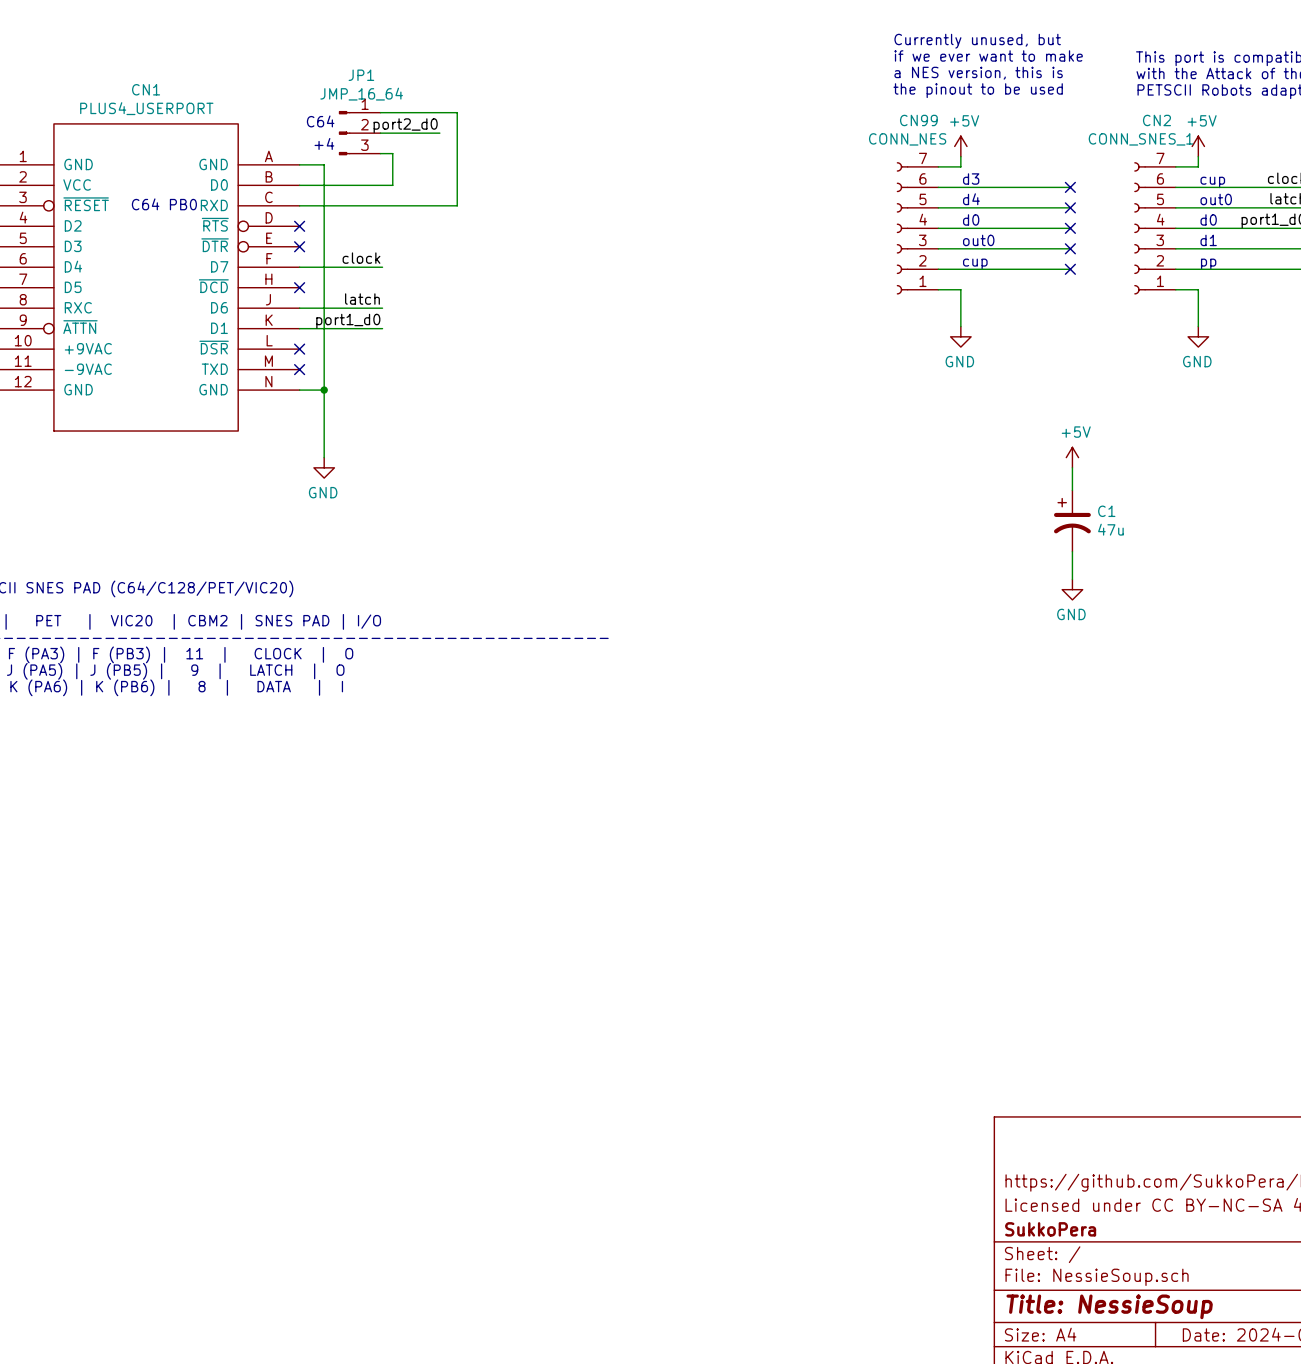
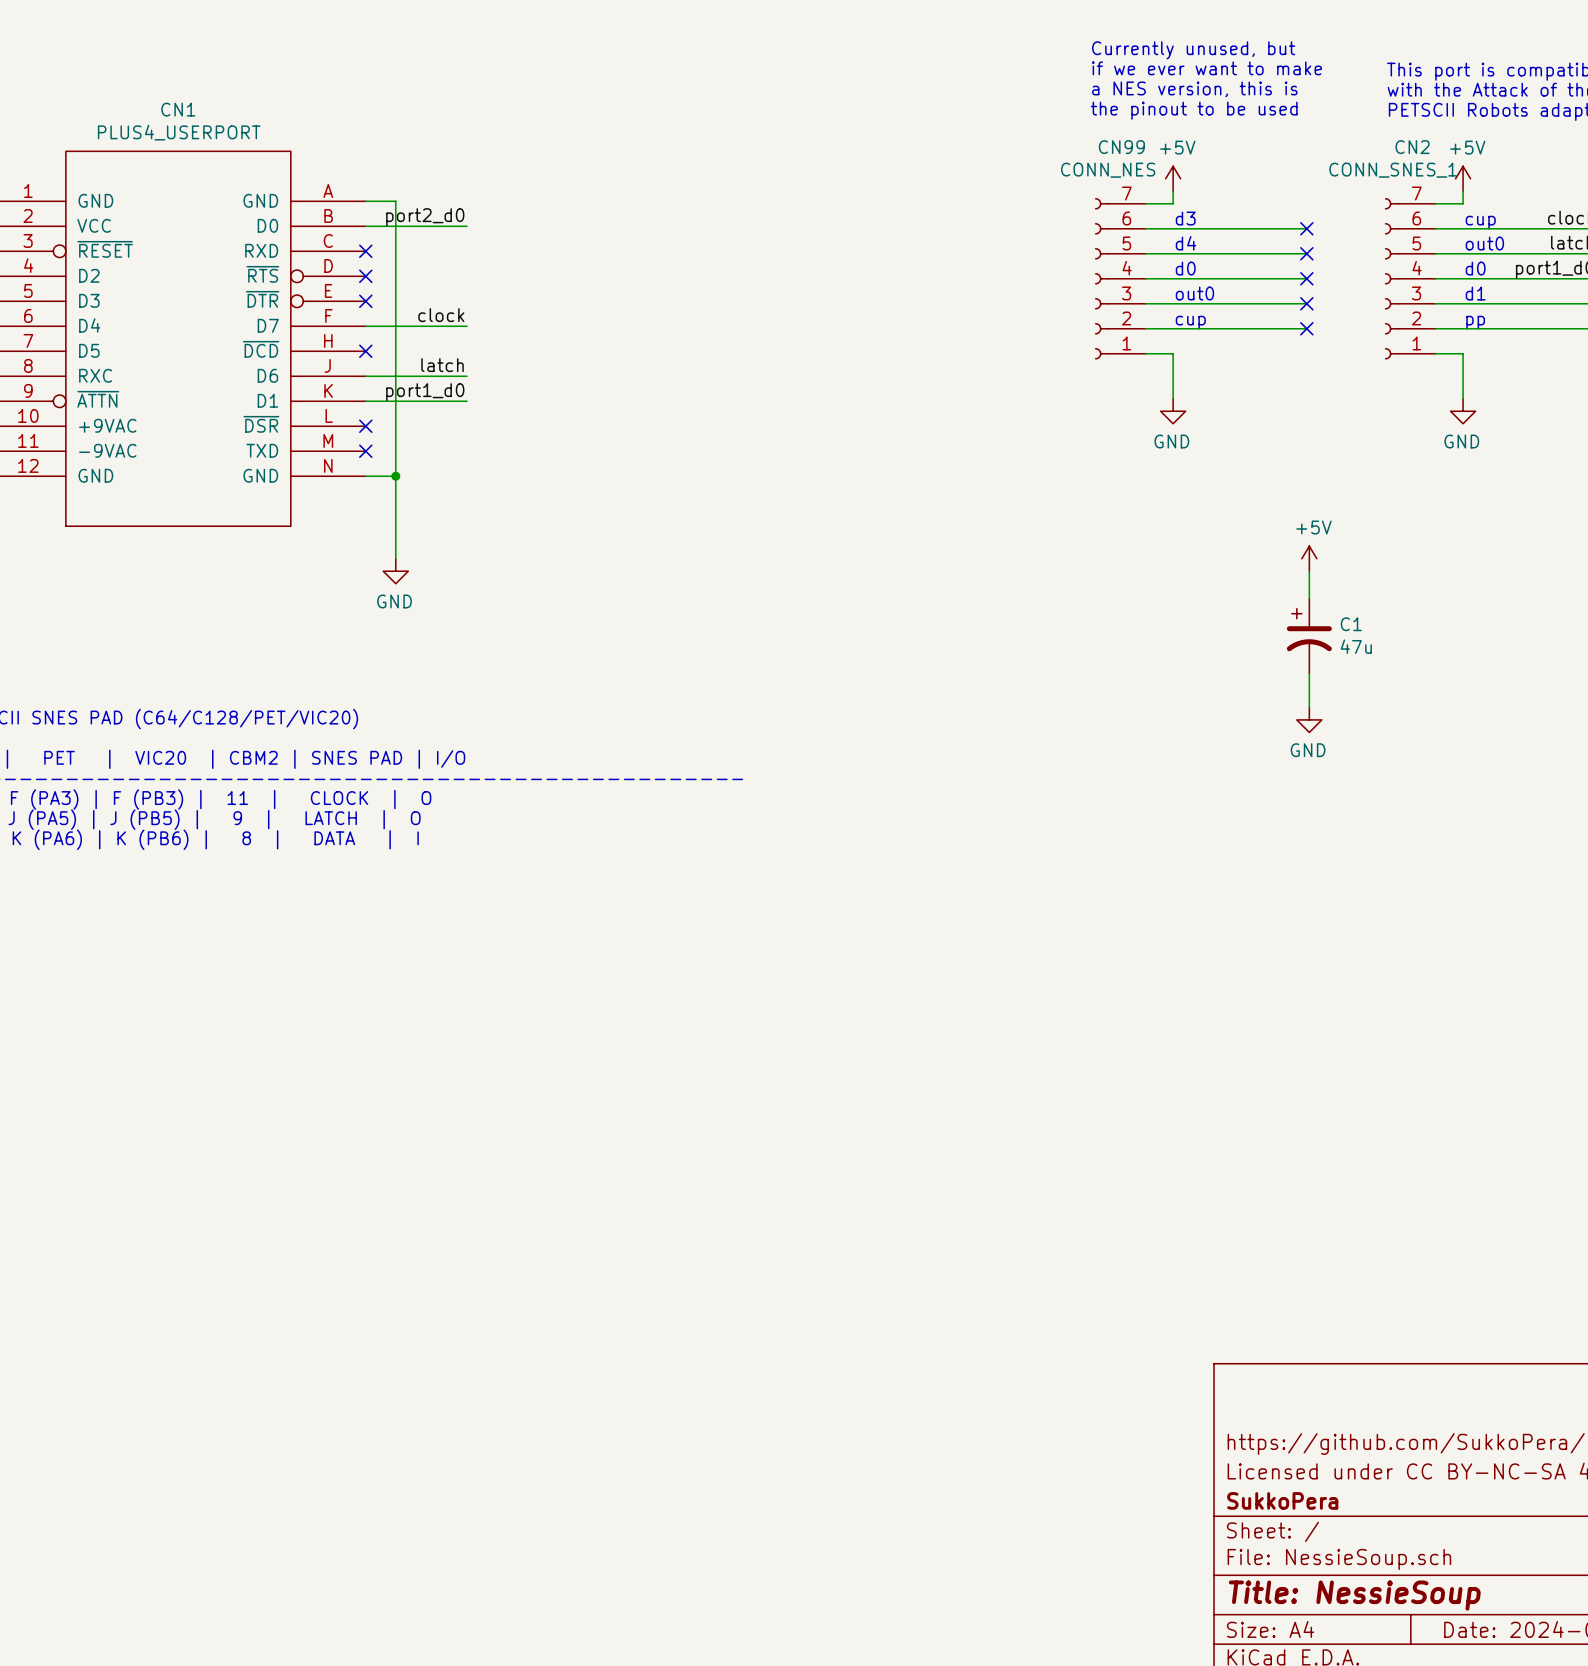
wire: (380, 112) (457, 112) (457, 205) (299, 205) -> none
text: C64 (320, 121) -> none
label position: port2_d0 (405, 125) -> port2_d0 (425, 217)
JP1: JMP_16_64 (359, 133) -> none
wire: (380, 133) (439, 133) -> none
text: +4 (324, 143) -> none
wire: (380, 153) (392, 153) (392, 185) (382, 185) -> none
text: C64 PB0 (164, 204) -> none
no-connect mark: none -> (365, 251)

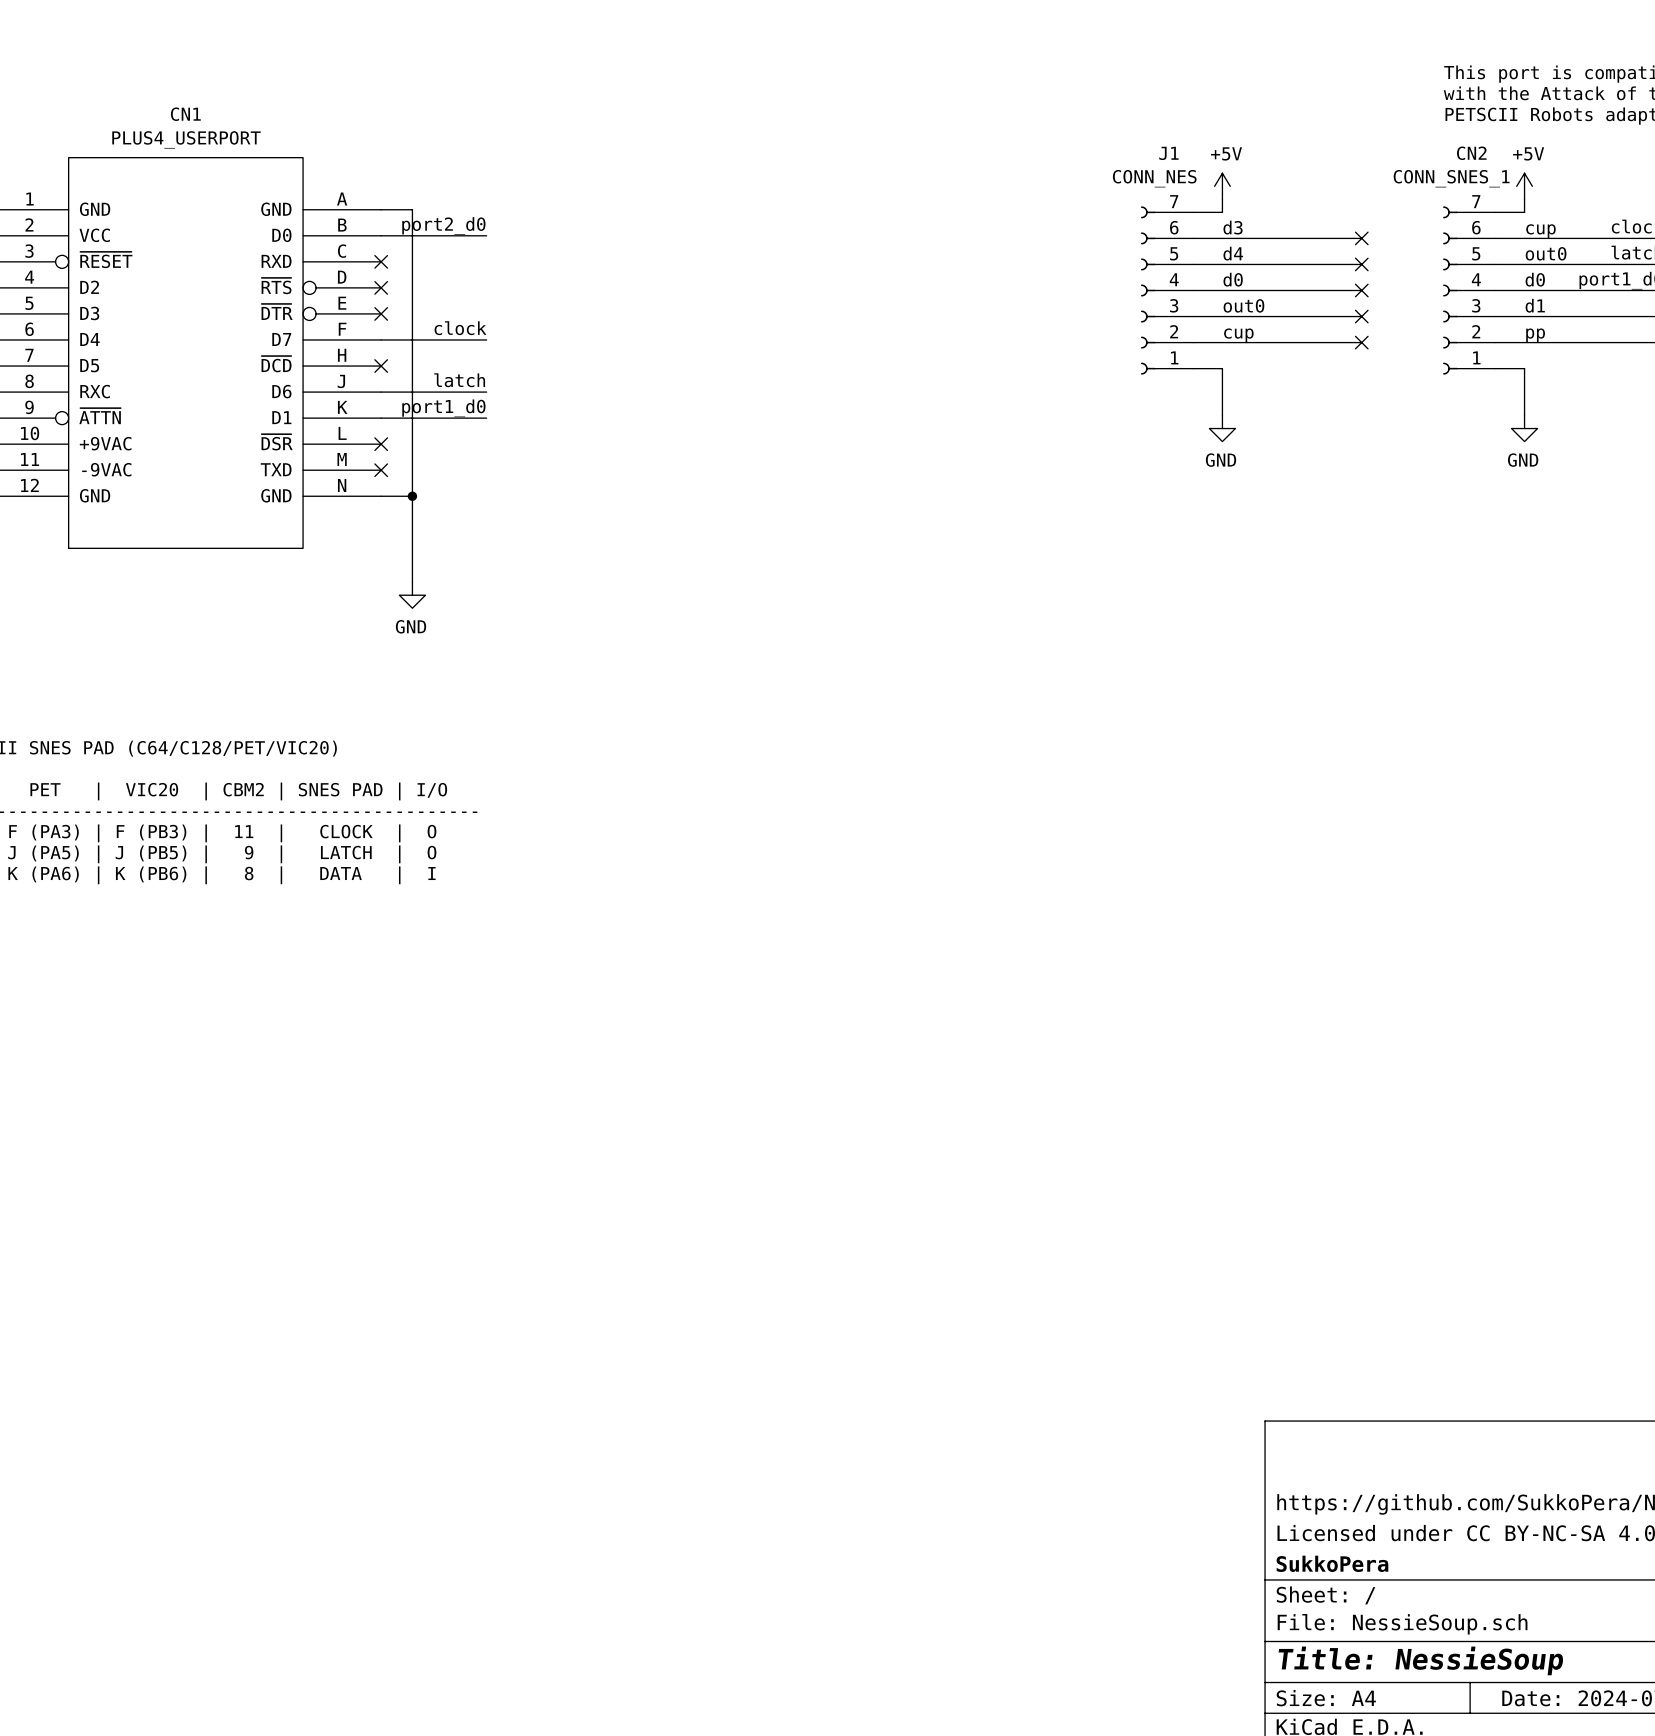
text: Currently unused, but (1193, 50) -> none
text: if we ever want to make (1207, 68) -> none
text: a NES version, this is (1194, 89) -> none
text: the pinout to be used (1194, 110) -> none
CN99 name: CN99 (1121, 147) -> J1 (1168, 153)
power symbol: +5V (1309, 558) -> none
wire: (1309, 571) (1309, 598) -> none
C1: 47u (1309, 636) -> none
wire: (1309, 673) (1309, 707) -> none
power symbol: GND (1309, 719) -> none

